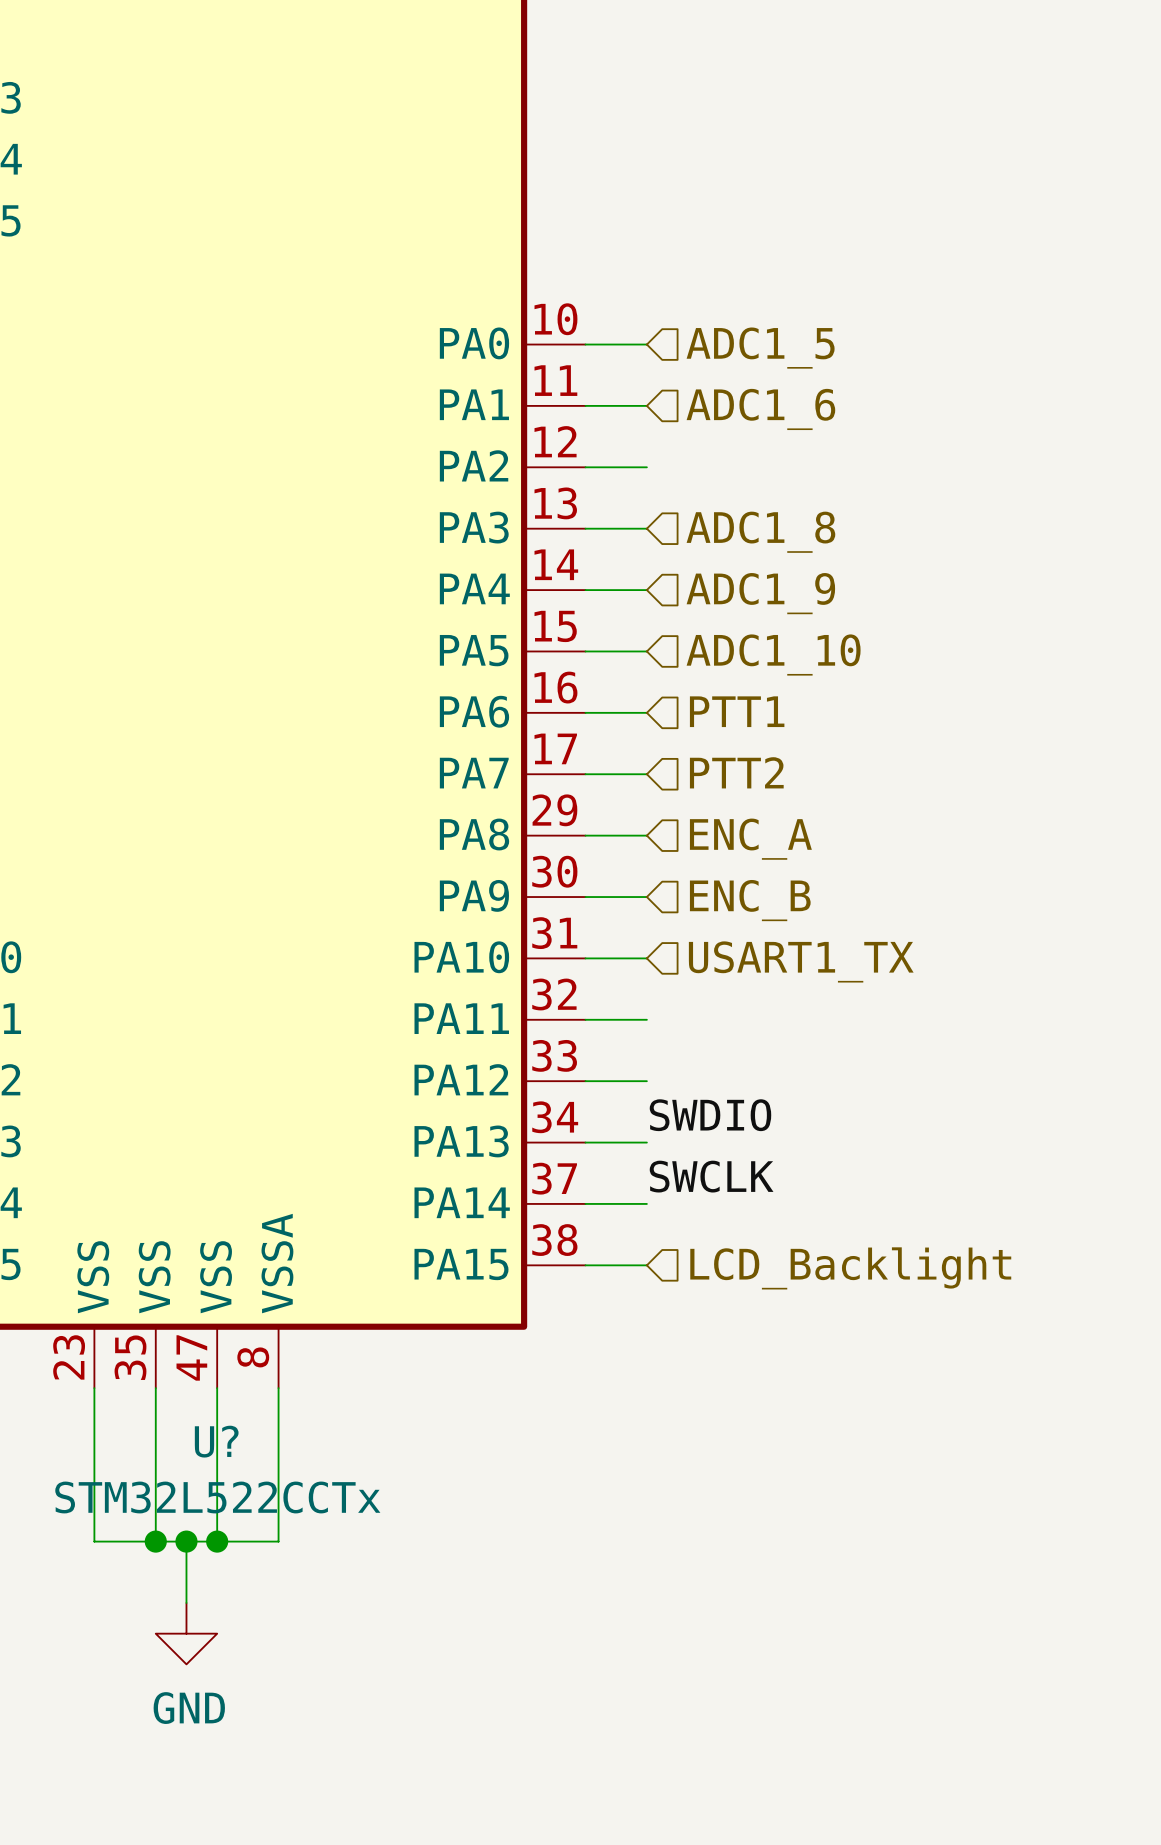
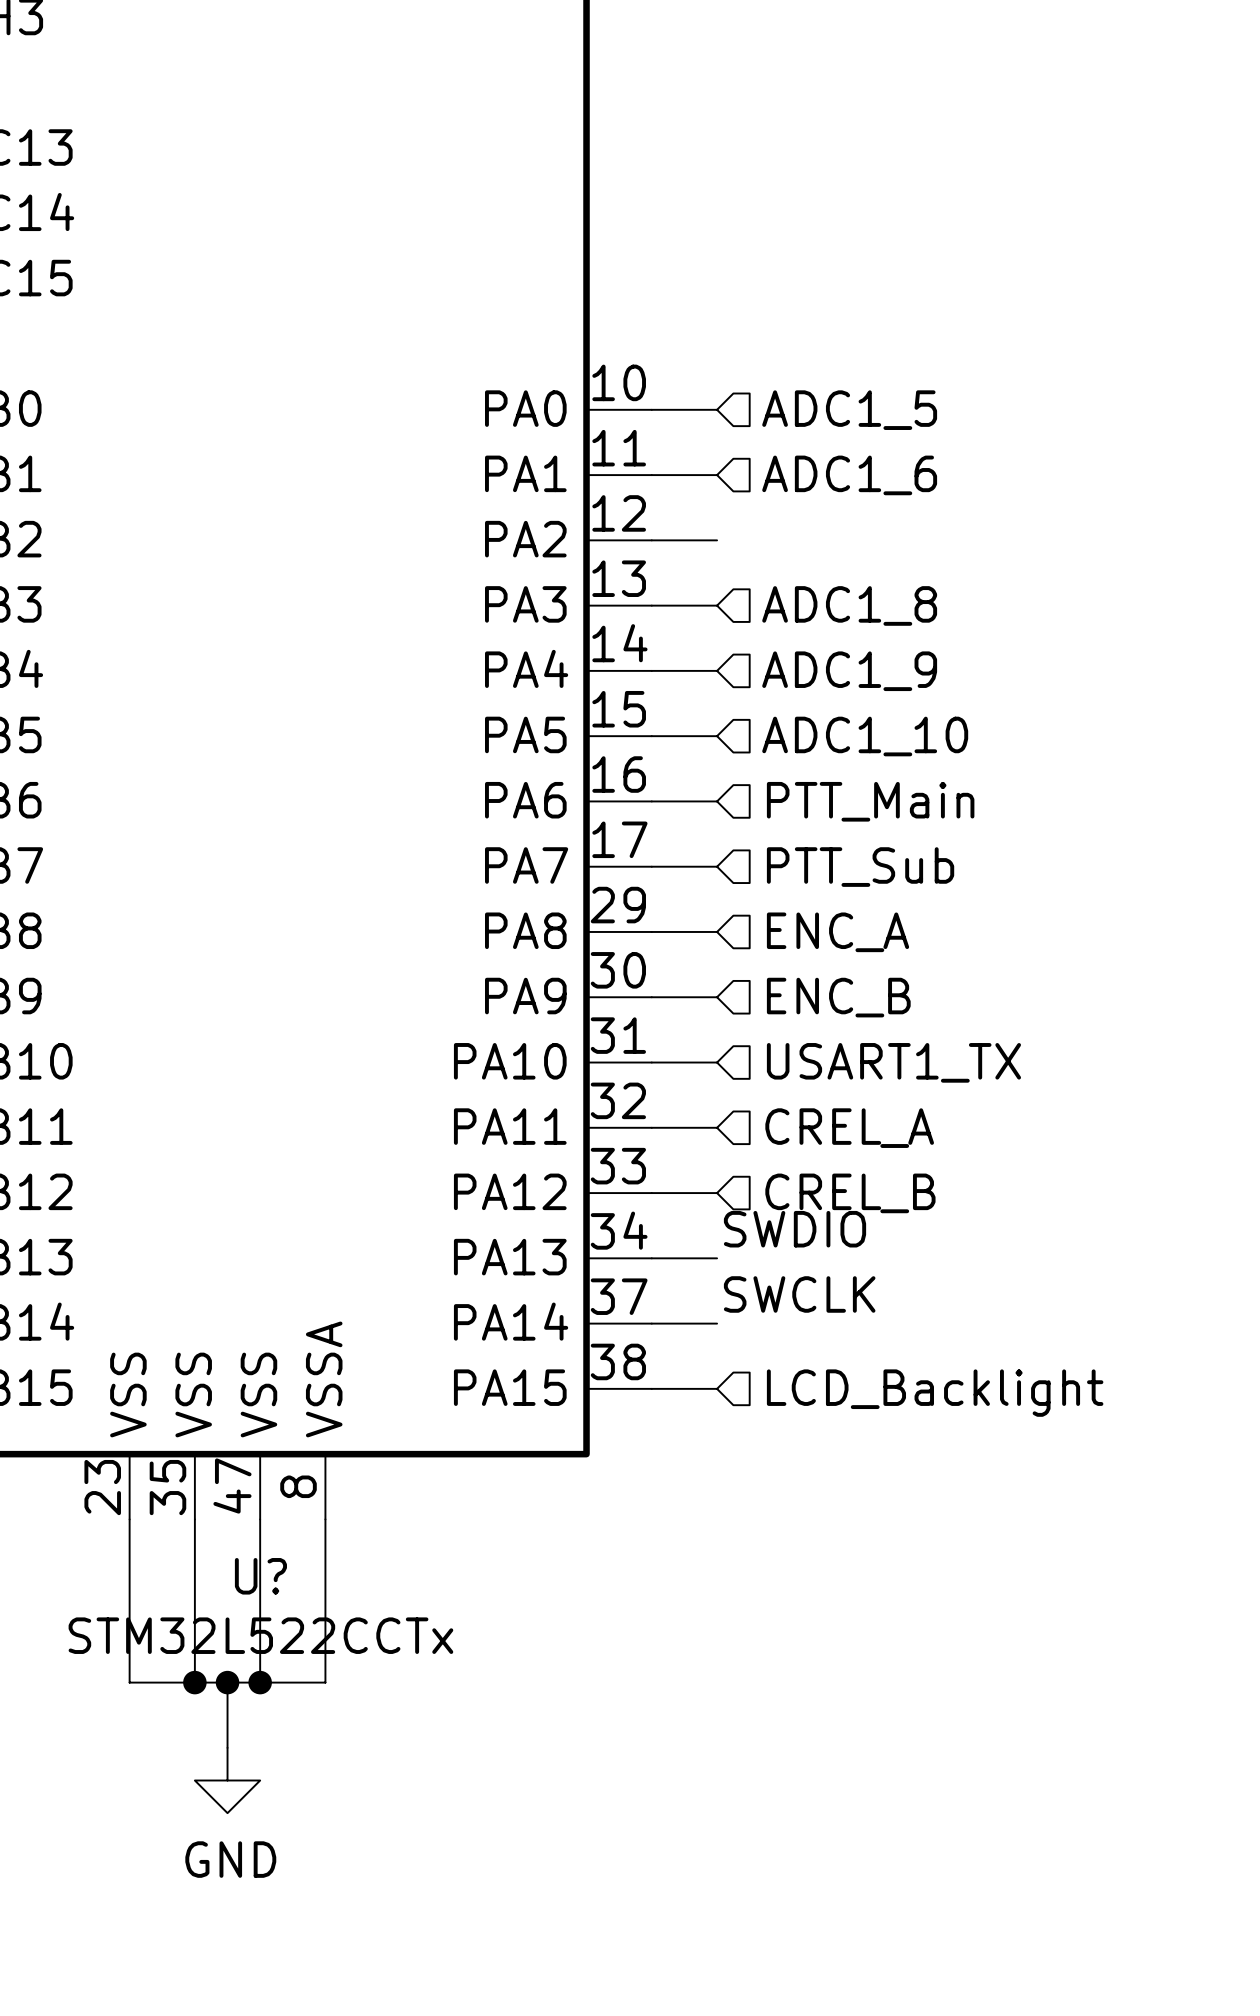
hierarchical label: PTT1 (737, 711) -> PTT_Main (870, 801)
hierarchical label: PTT2 (736, 772) -> PTT_Sub (860, 867)
hierarchical label: none -> CREL_A (849, 1128)
hierarchical label: none -> CREL_B (850, 1193)

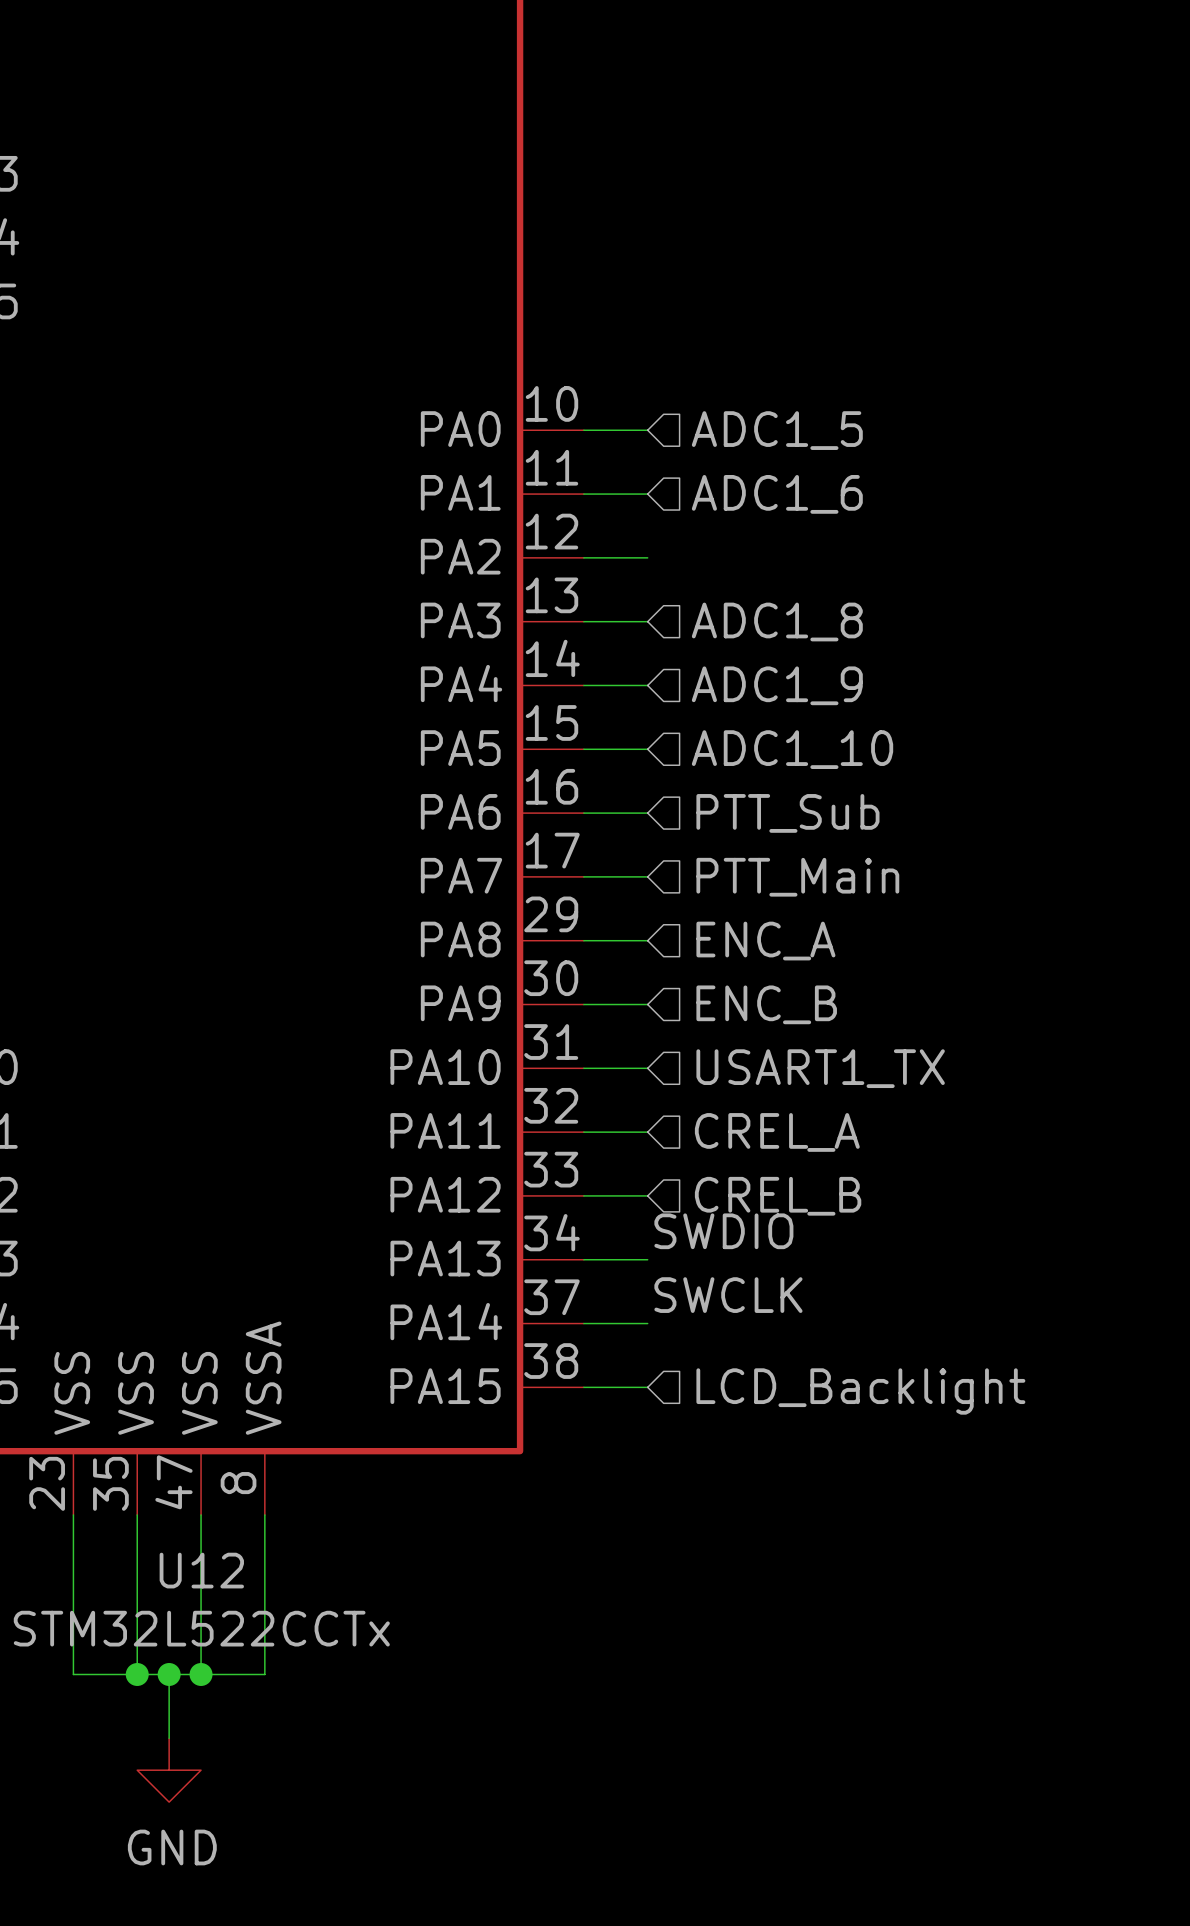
hierarchical label: PTT_Main (870, 801) -> PTT_Sub (787, 813)
hierarchical label: PTT_Sub (860, 867) -> PTT_Main (797, 877)
U? name: U? (260, 1576) -> U12 (201, 1570)

